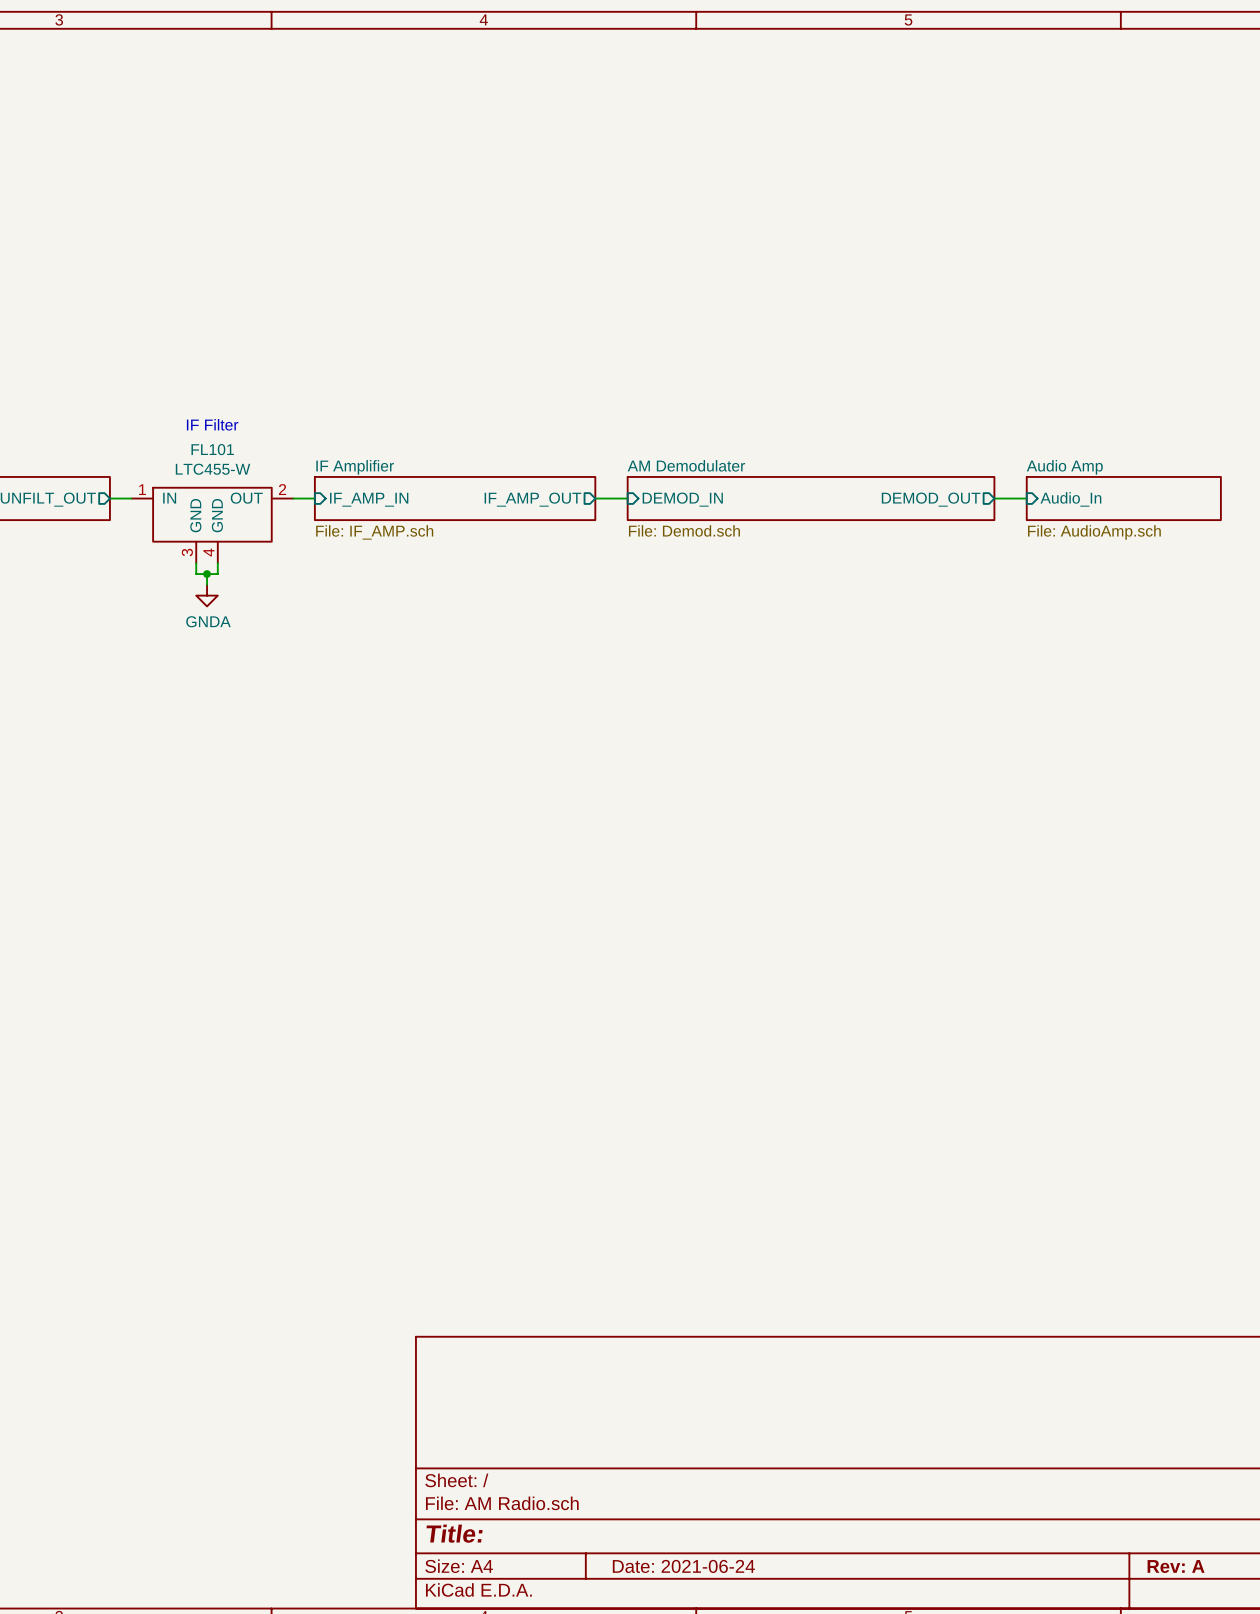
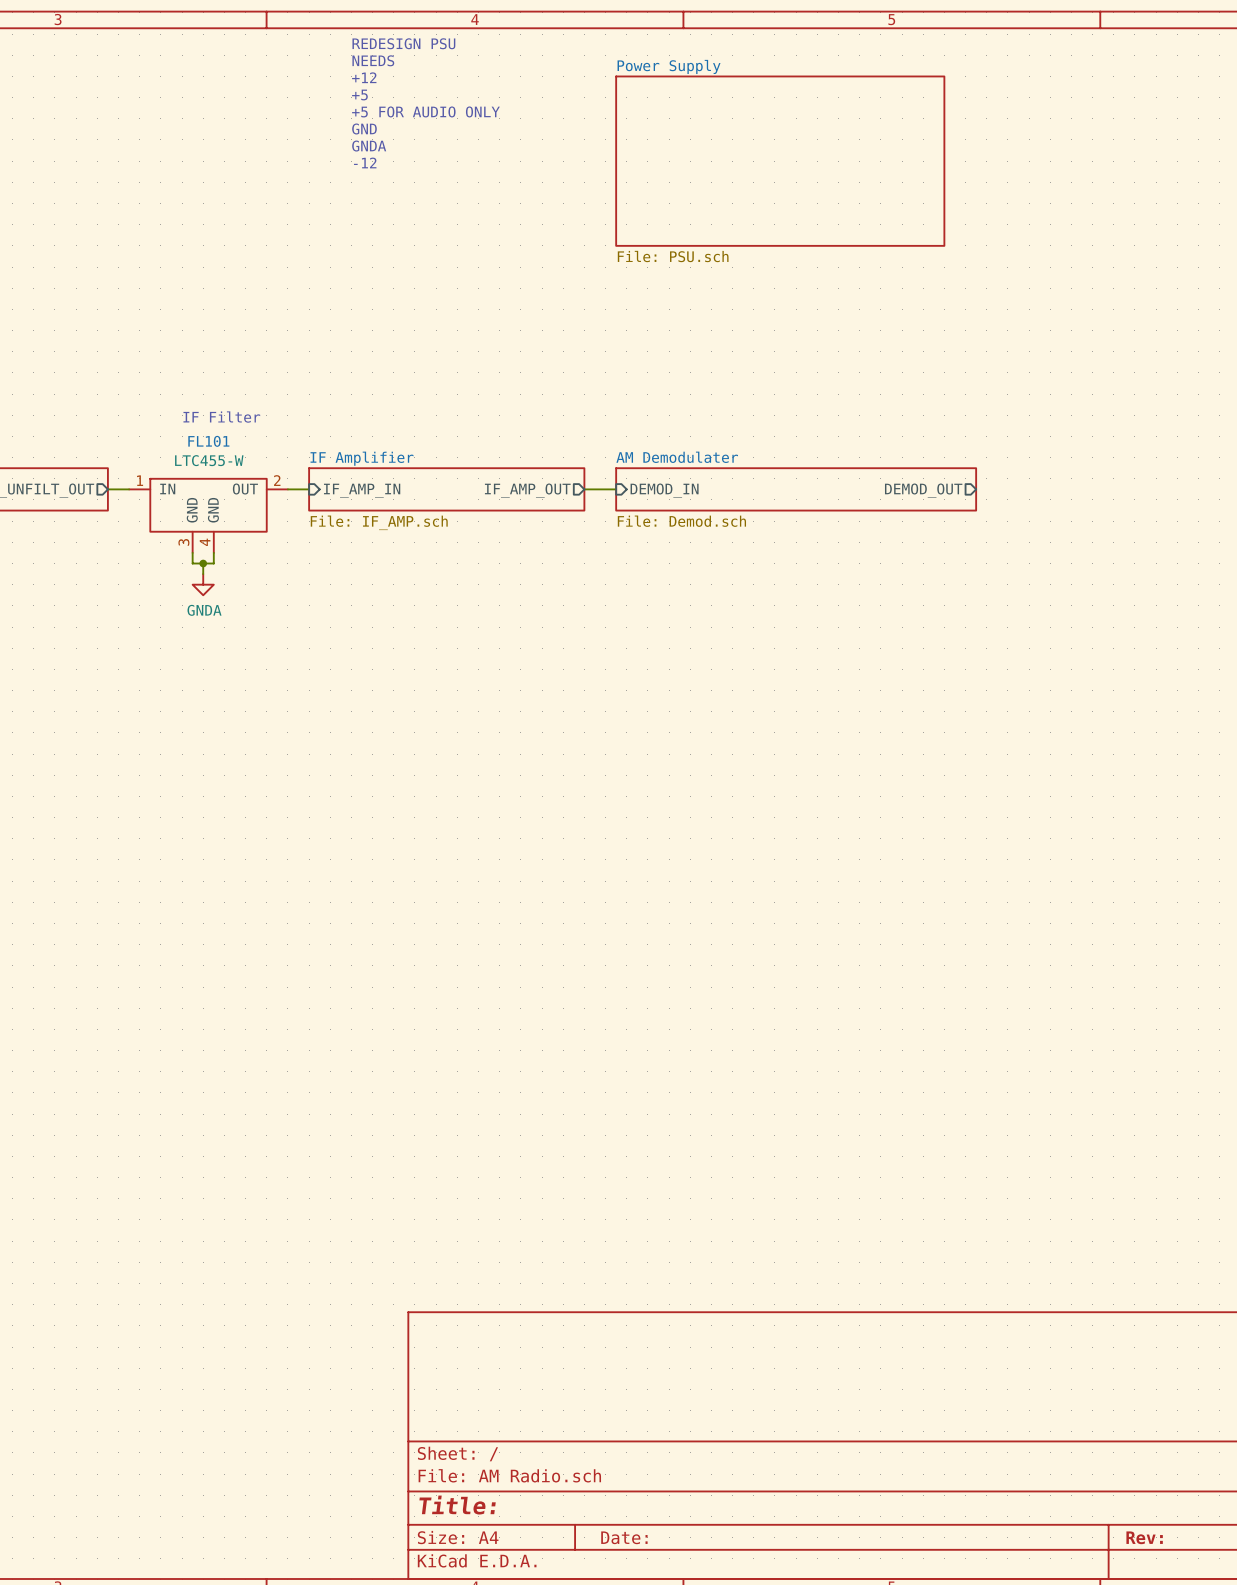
text: none -> REDESIGN PSU (403, 43)
text: none -> NEEDS (373, 60)
text: none -> +12 (364, 77)
text: none -> +5 (359, 94)
text: none -> +5 FOR AUDIO ONLY (425, 111)
text: none -> GND (364, 128)
text: none -> GNDA (369, 146)
sheet Power Supply: none -> File: PSU.sch (780, 161)
text: none -> -12 (365, 162)
wire: (994, 498) (1026, 498) -> none
sheet Audio Amp: File: AudioAmp.sch (1123, 498) -> none
sheet pin: Audio_In (1070, 499) -> none
title block: Date: 2021-06-24 (683, 1566) -> Date: (624, 1537)
title block: Rev: A (1176, 1566) -> Rev: (1144, 1537)

